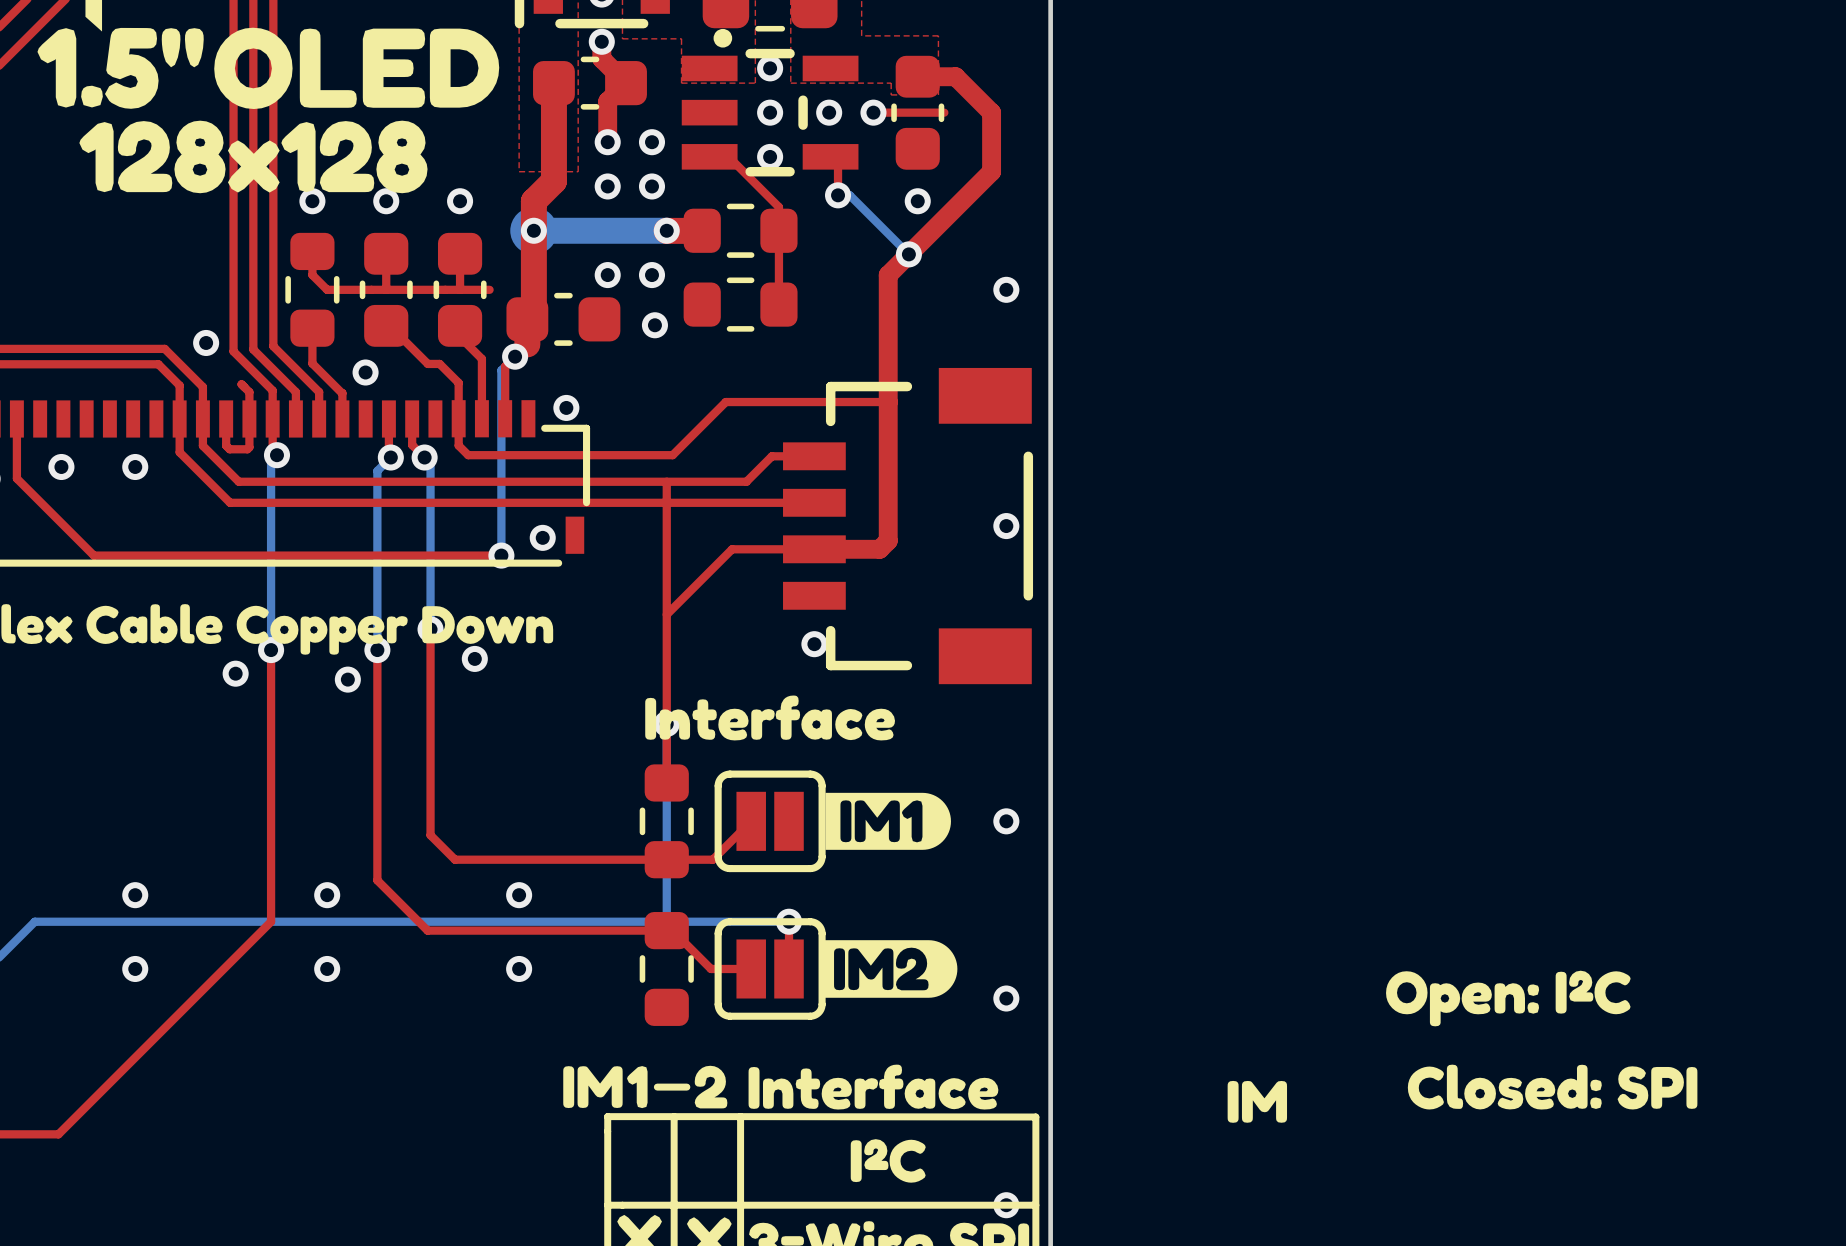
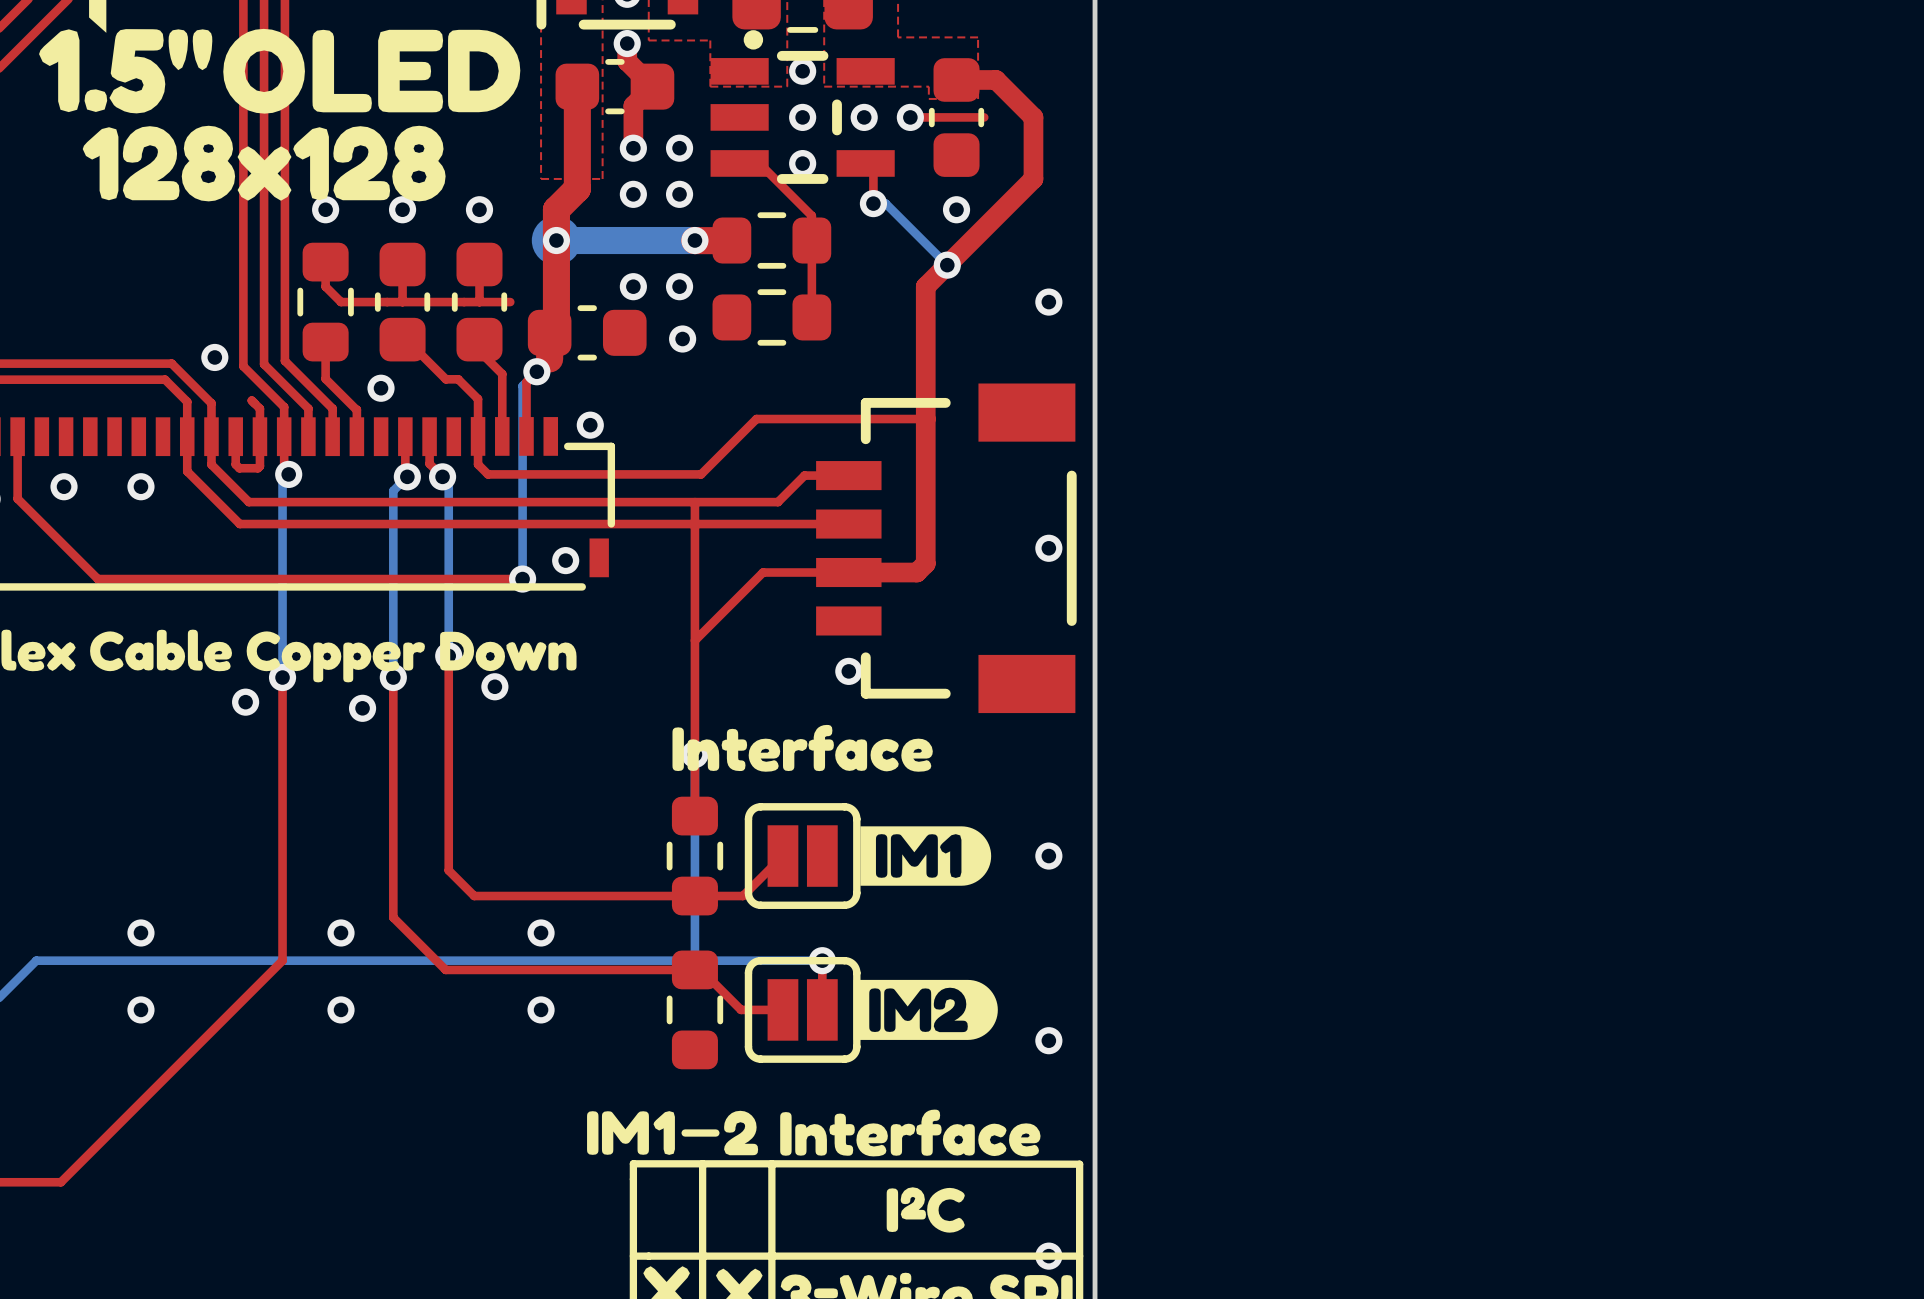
drawing: [1386, 970, 1698, 1110] -> none
drawing: [1227, 1080, 1288, 1123] -> none

